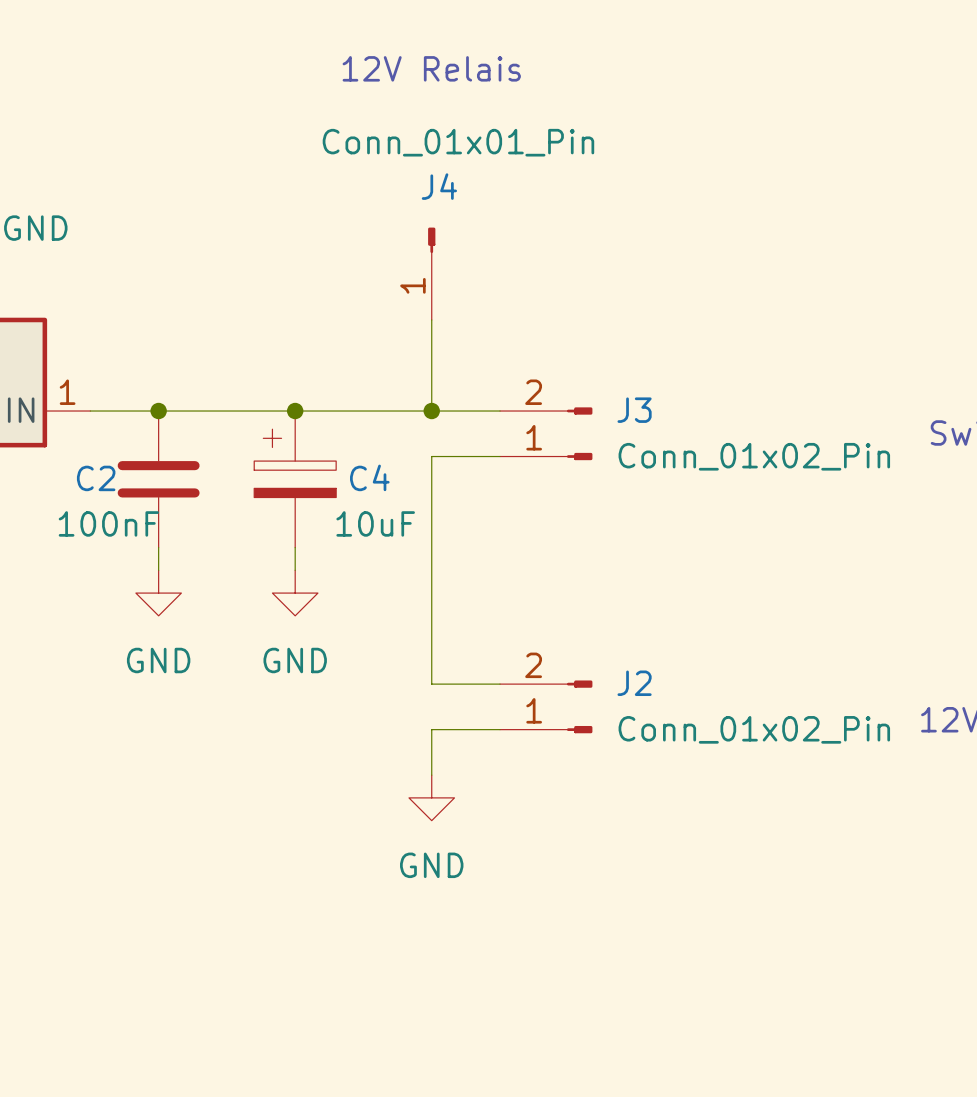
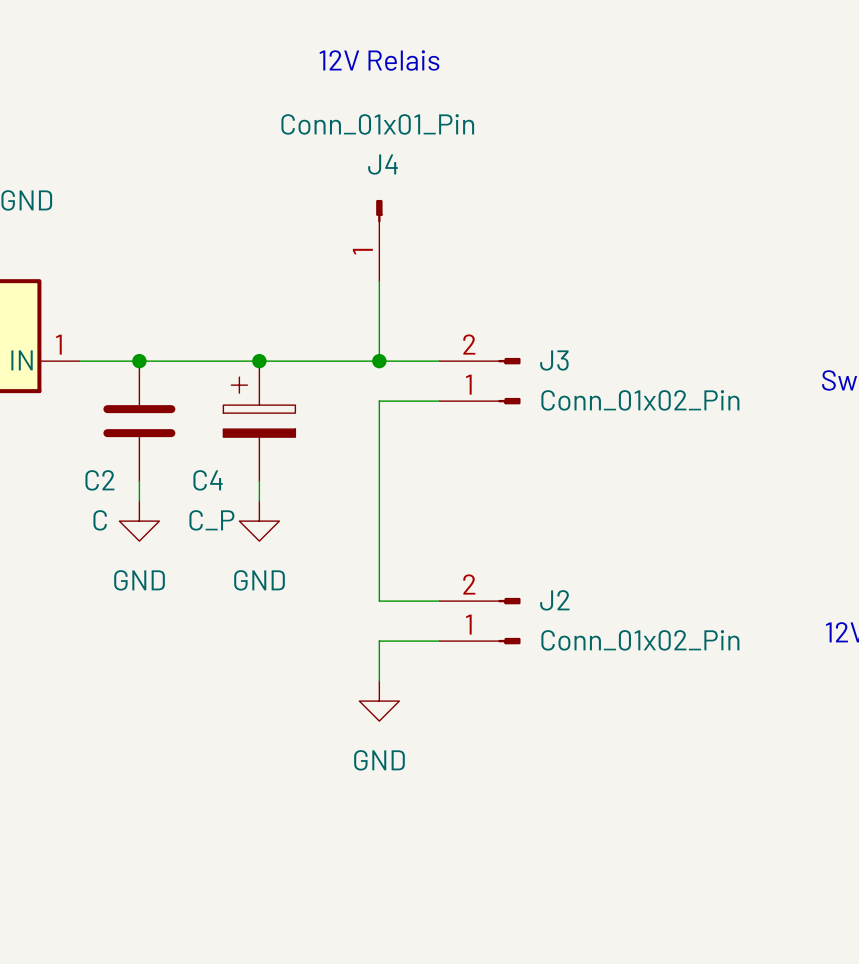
C4 name position: C4 (369, 477) -> C4 (208, 480)
C2 name position: C2 (96, 478) -> C2 (99, 480)
C2 value: 100nF (108, 523) -> C (100, 520)
C4 value: 10uF (375, 523) -> C_P (211, 520)

